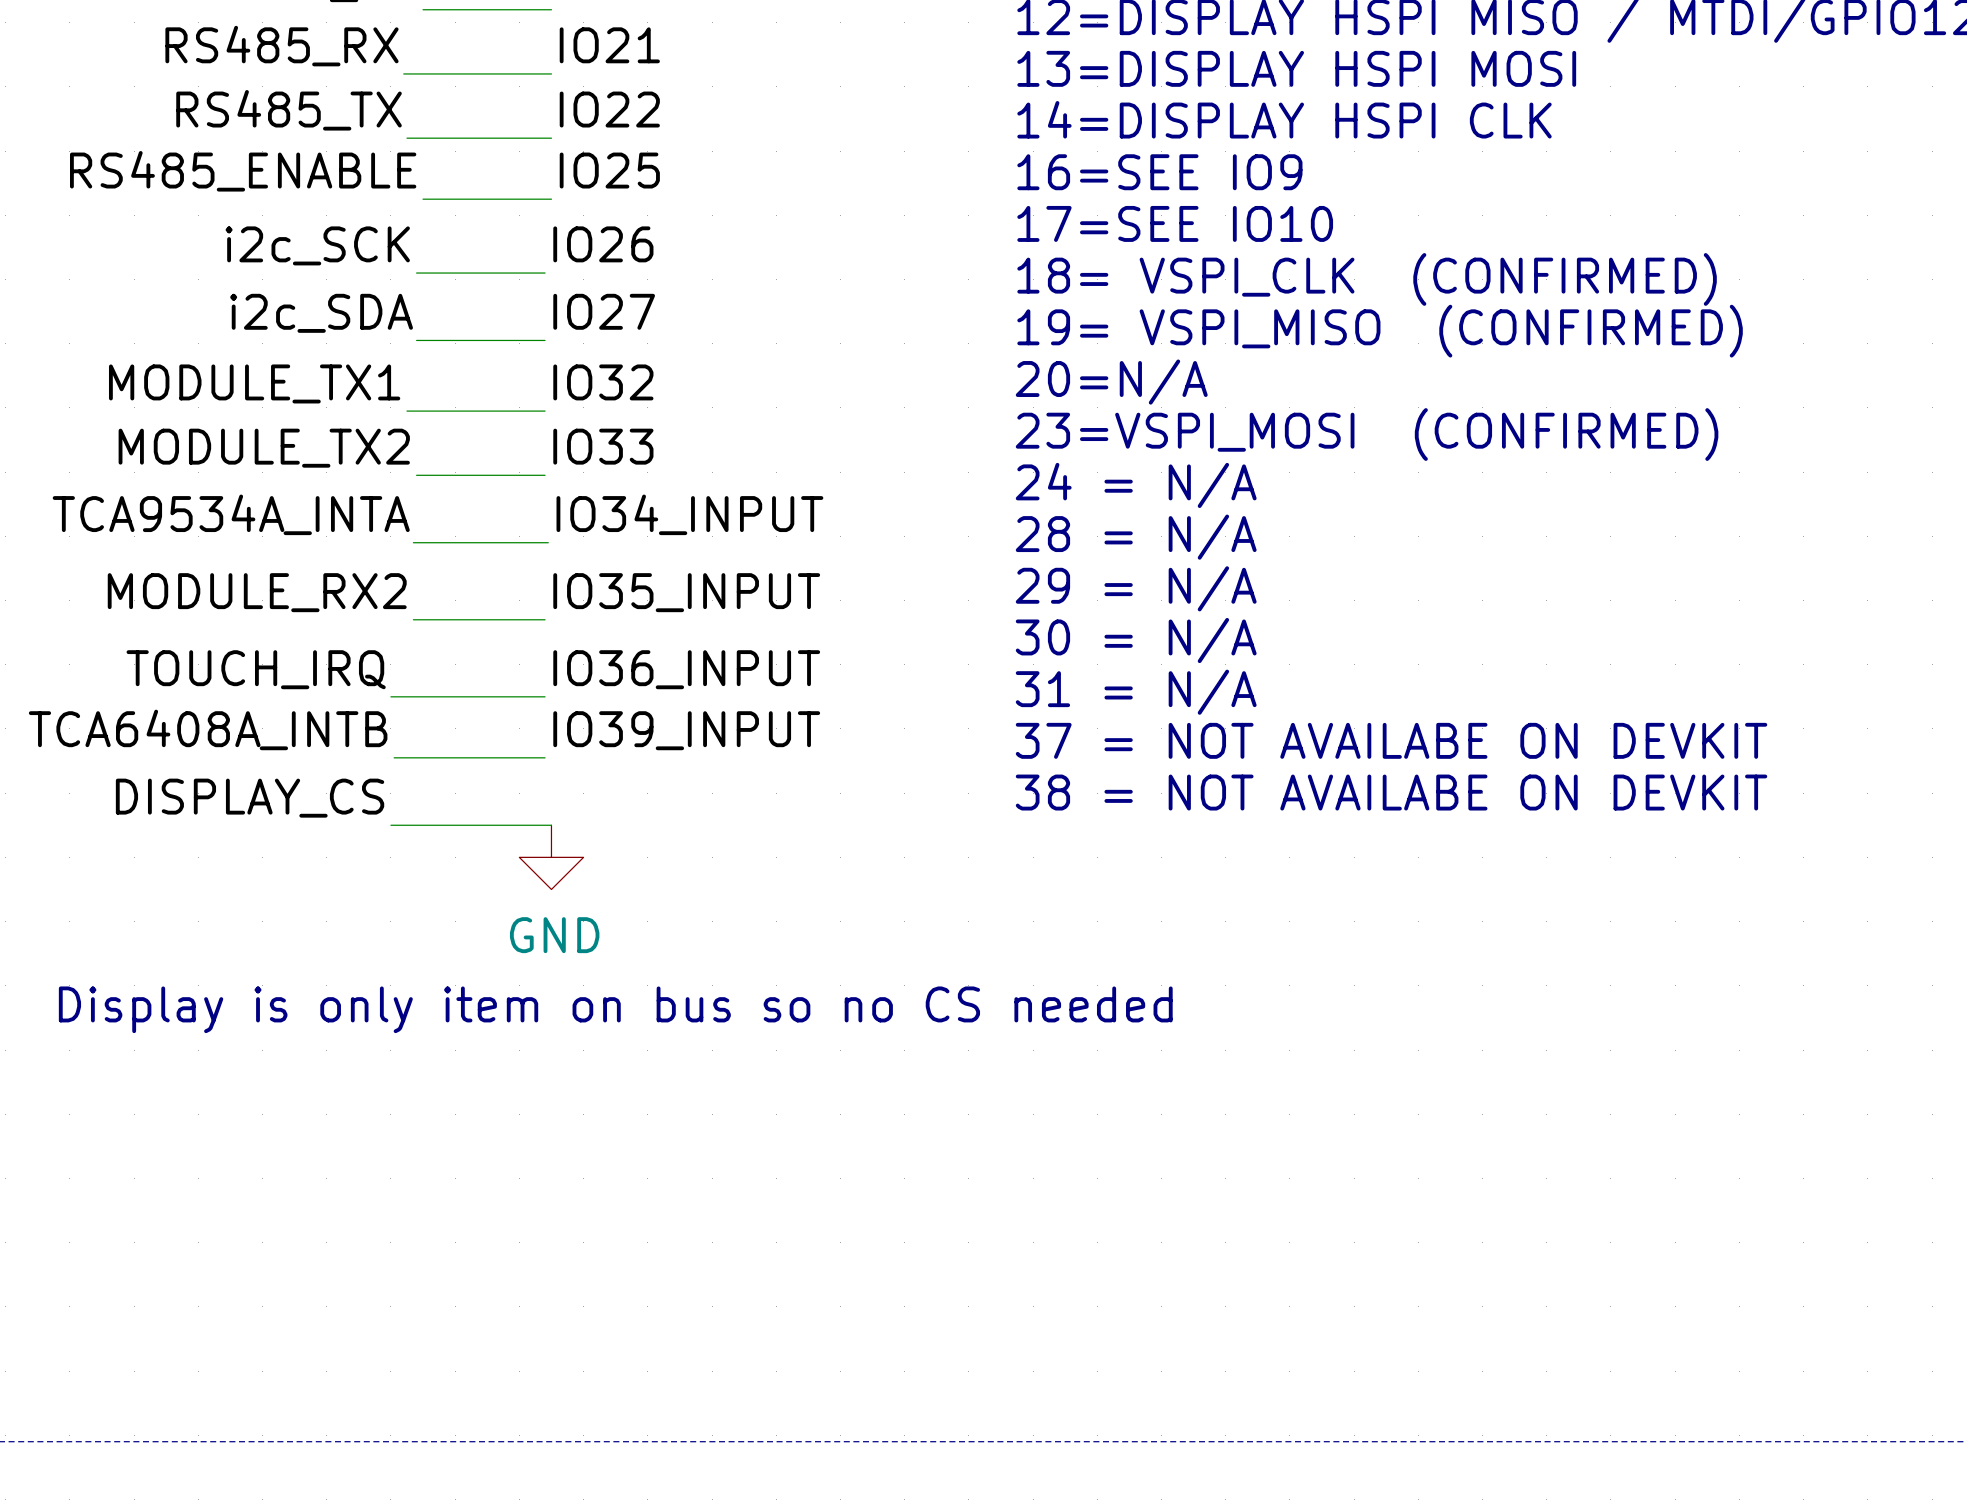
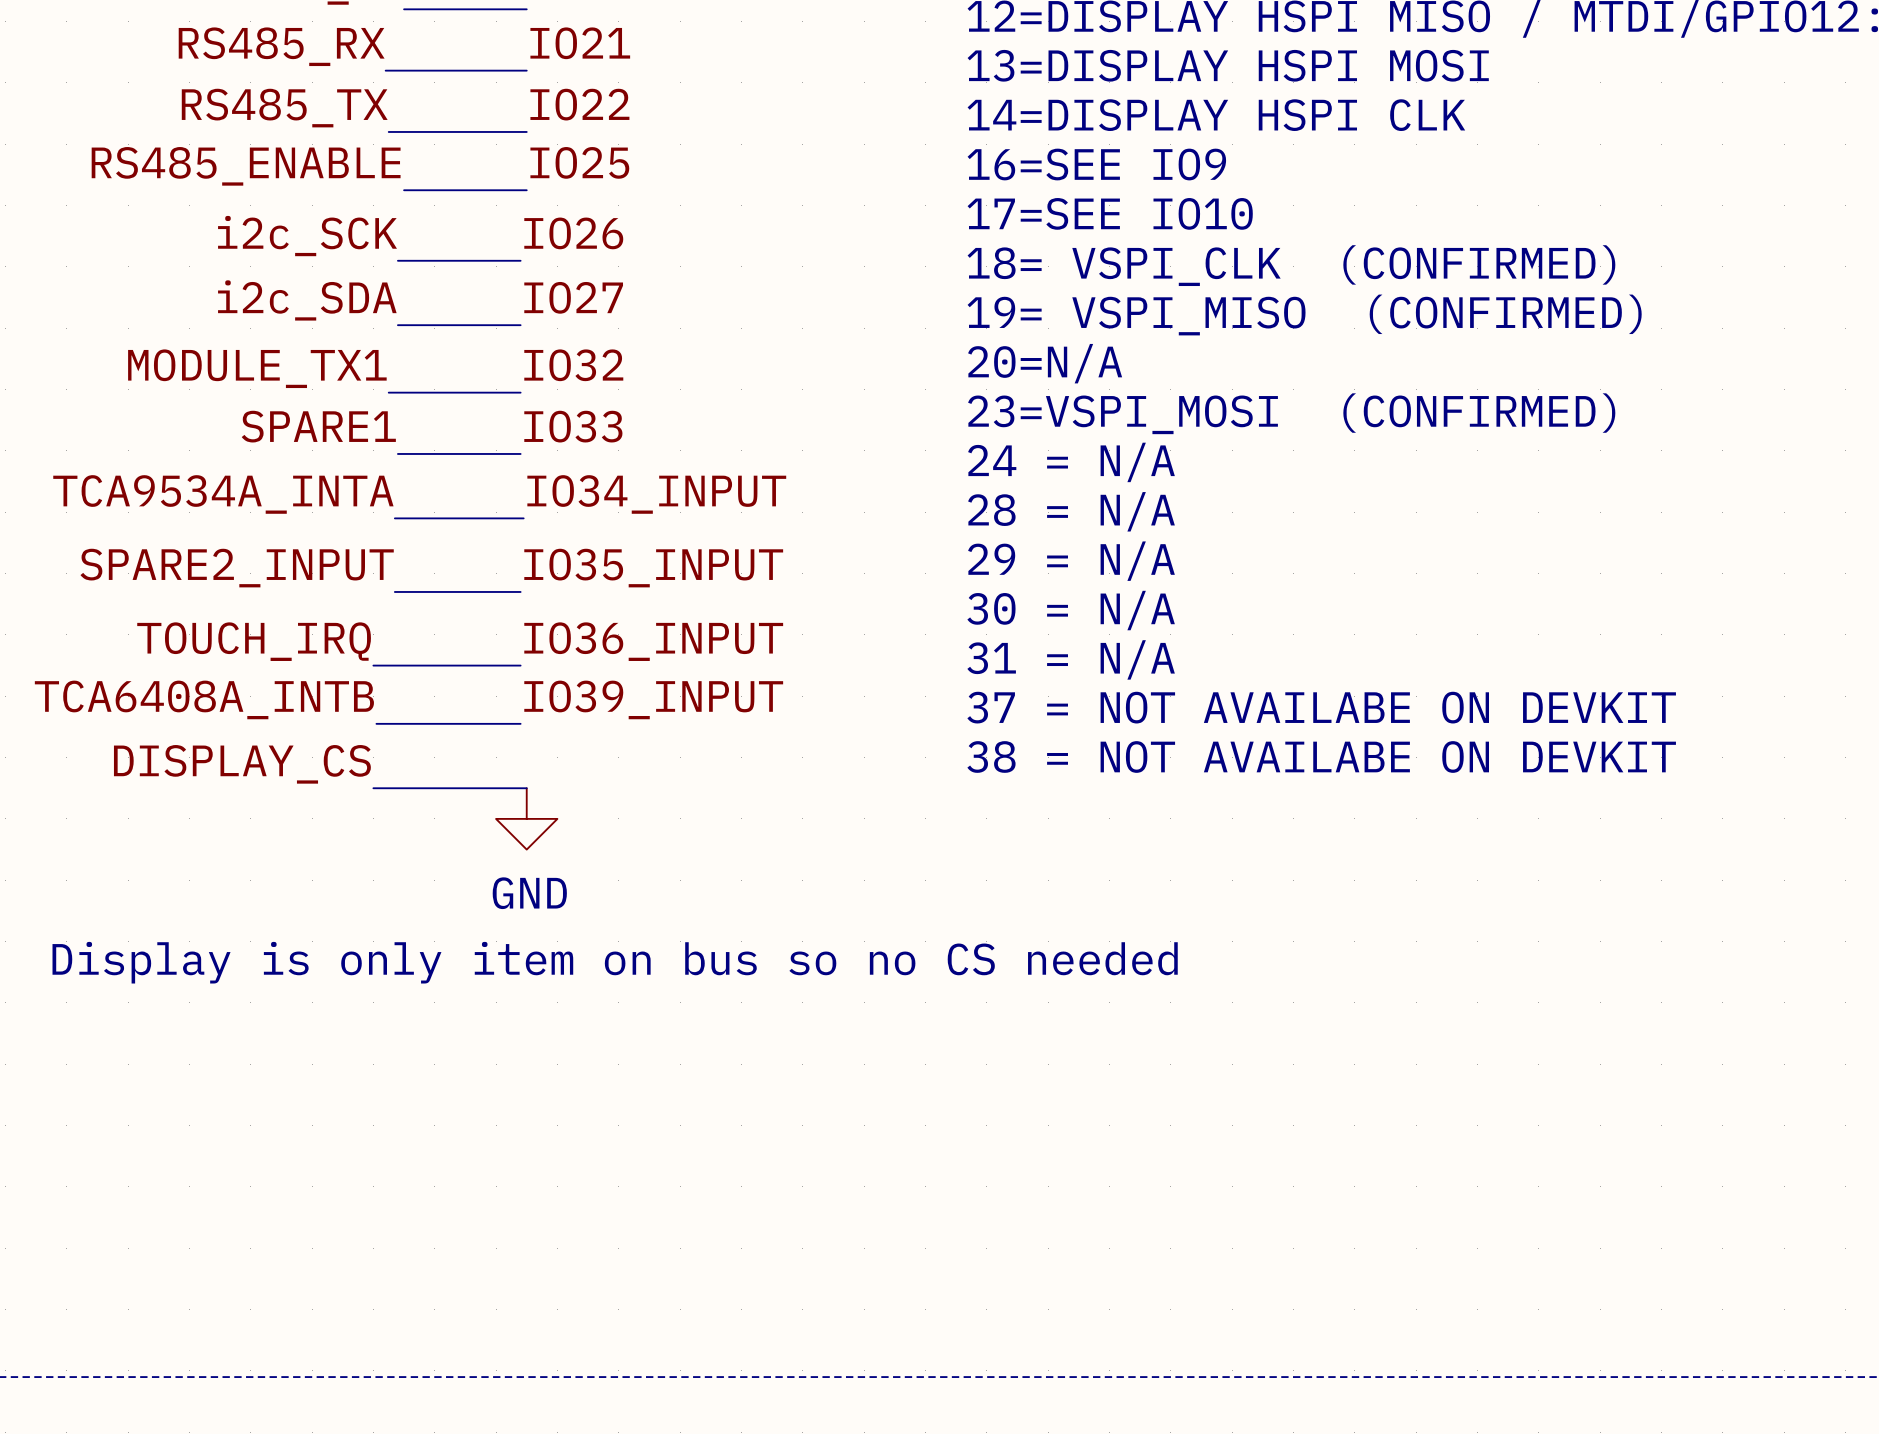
label: MODULE_TX2 (264, 448) -> SPARE1 (318, 426)
label: MODULE_RX2 (257, 592) -> SPARE2_INPUT (237, 568)

